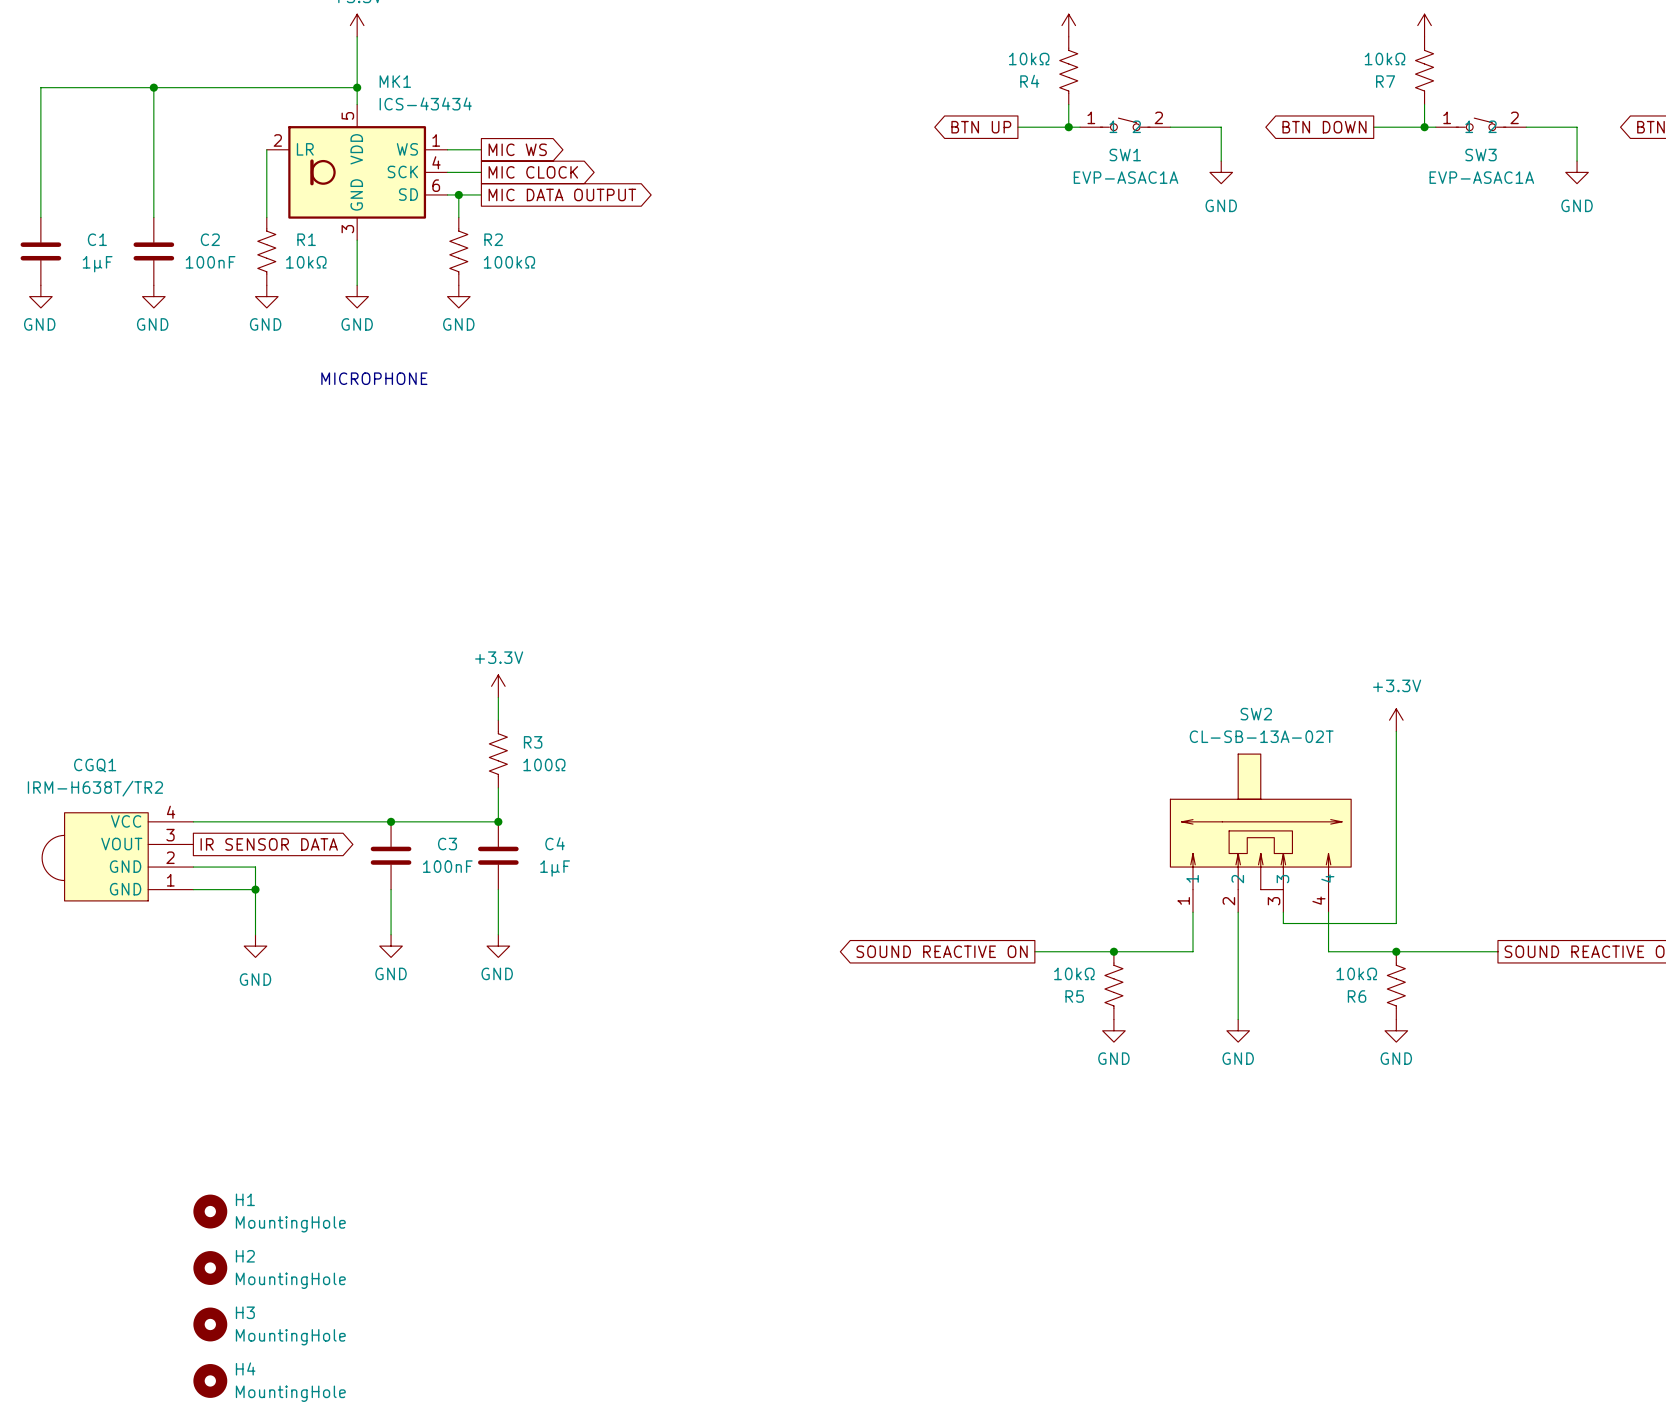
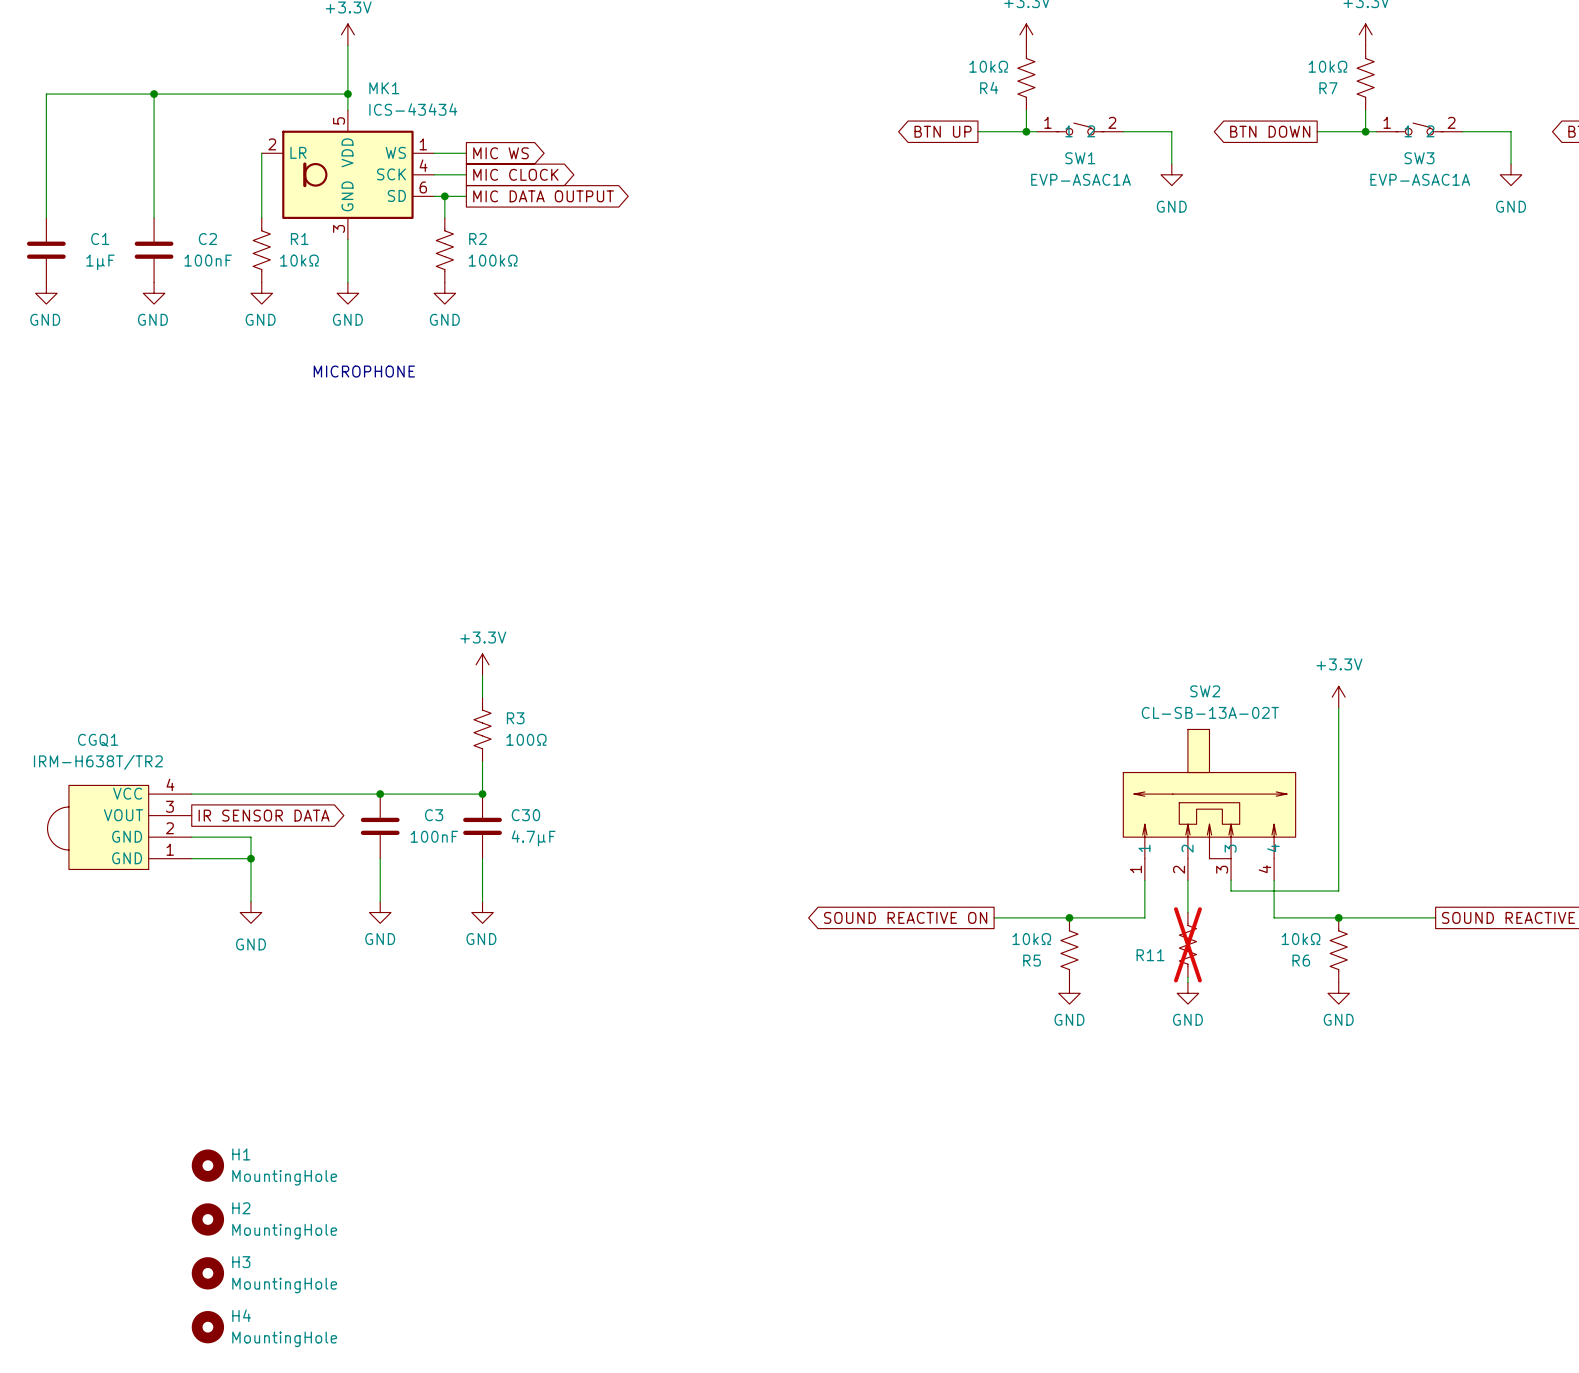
C4 name: C4 (555, 843) -> C30 (525, 815)
C4 value: 1µF (555, 868) -> 4.7µF (533, 838)
R11: none -> (1187, 944)

